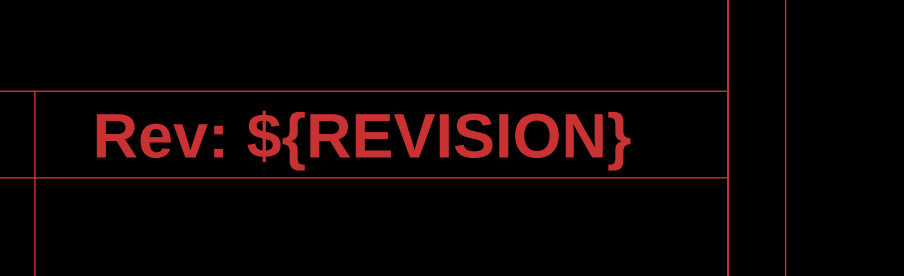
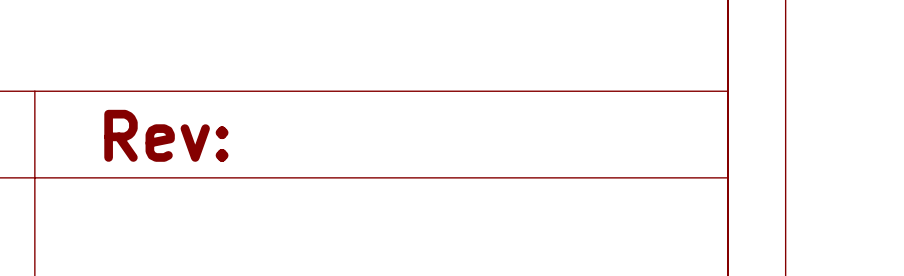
title block: Rev: ${REVISION} (363, 140) -> Rev: (166, 135)

